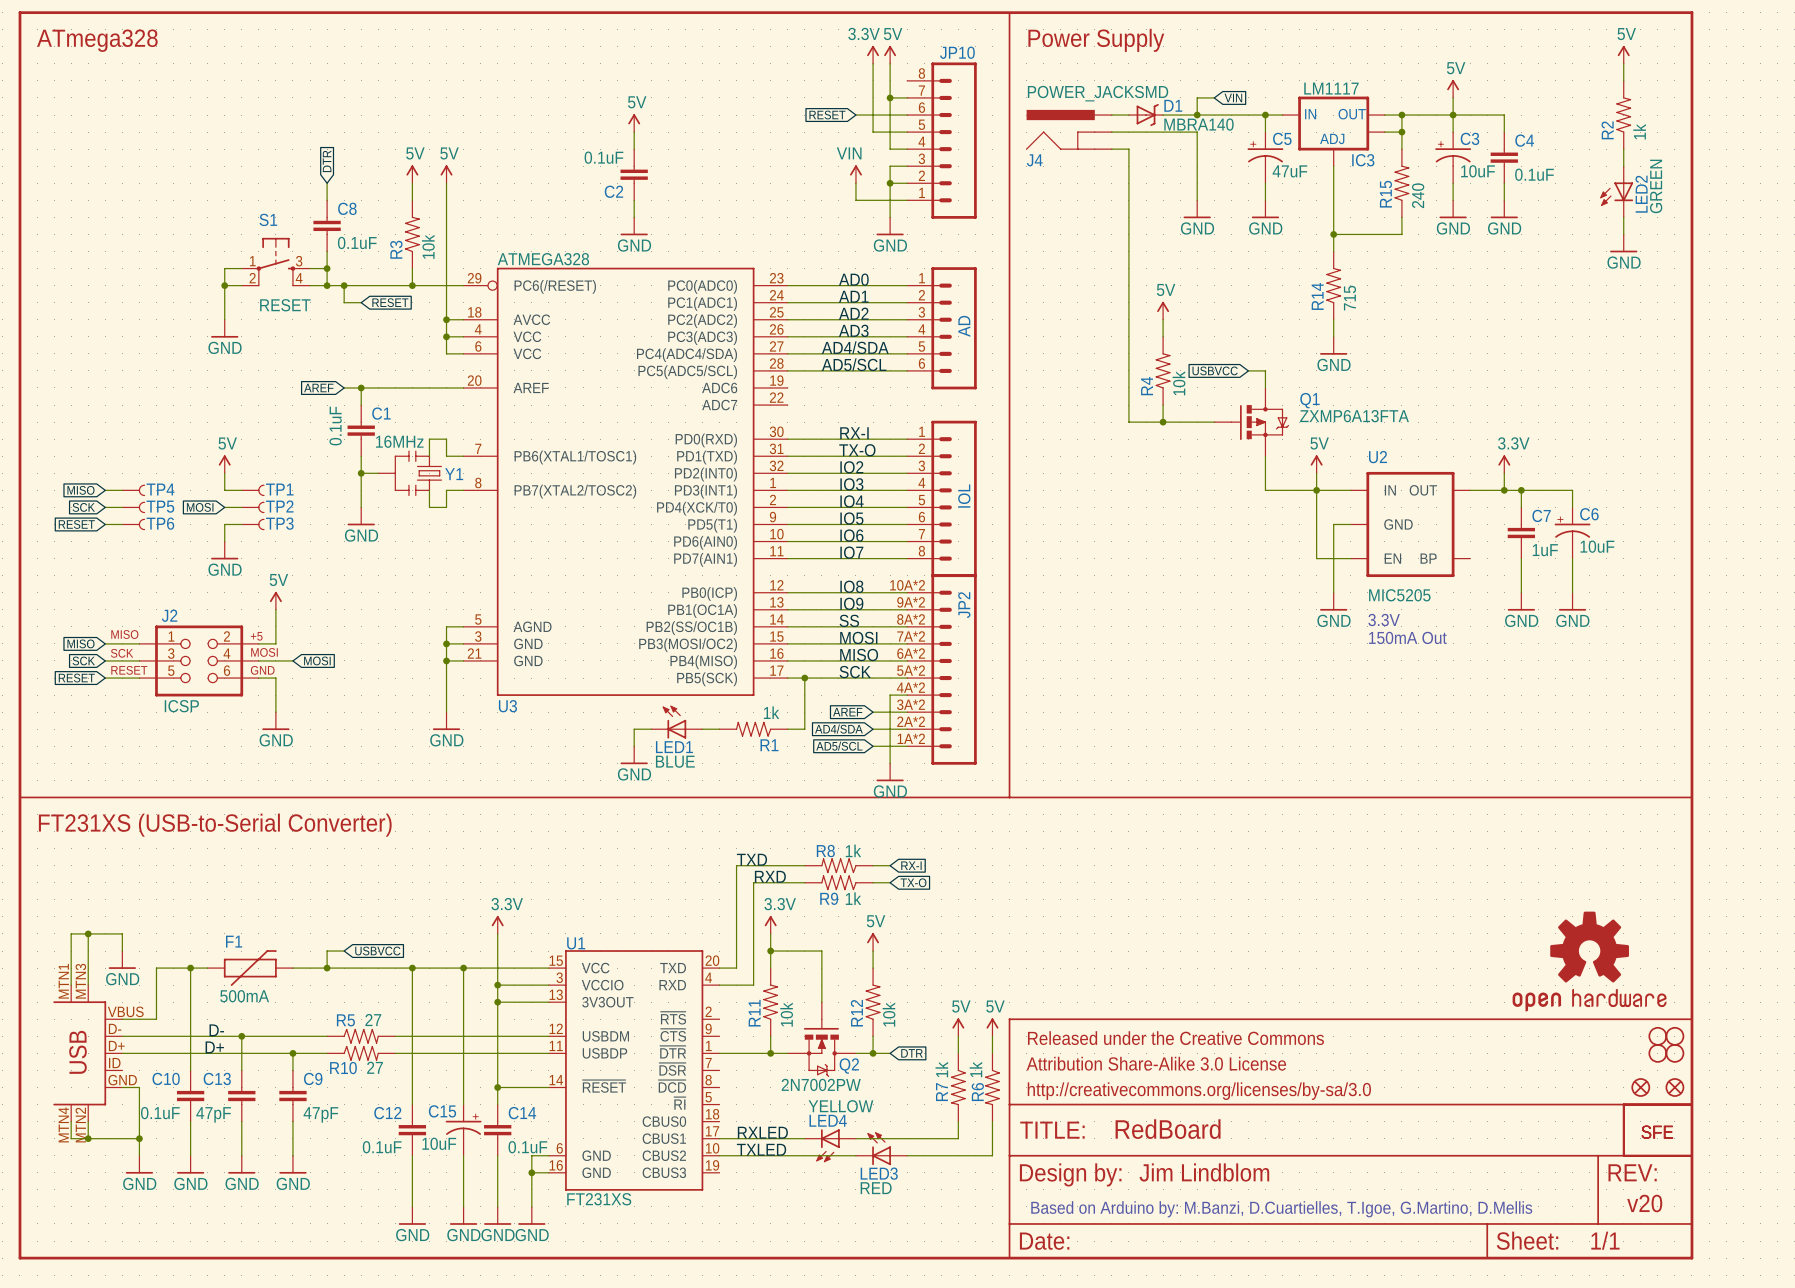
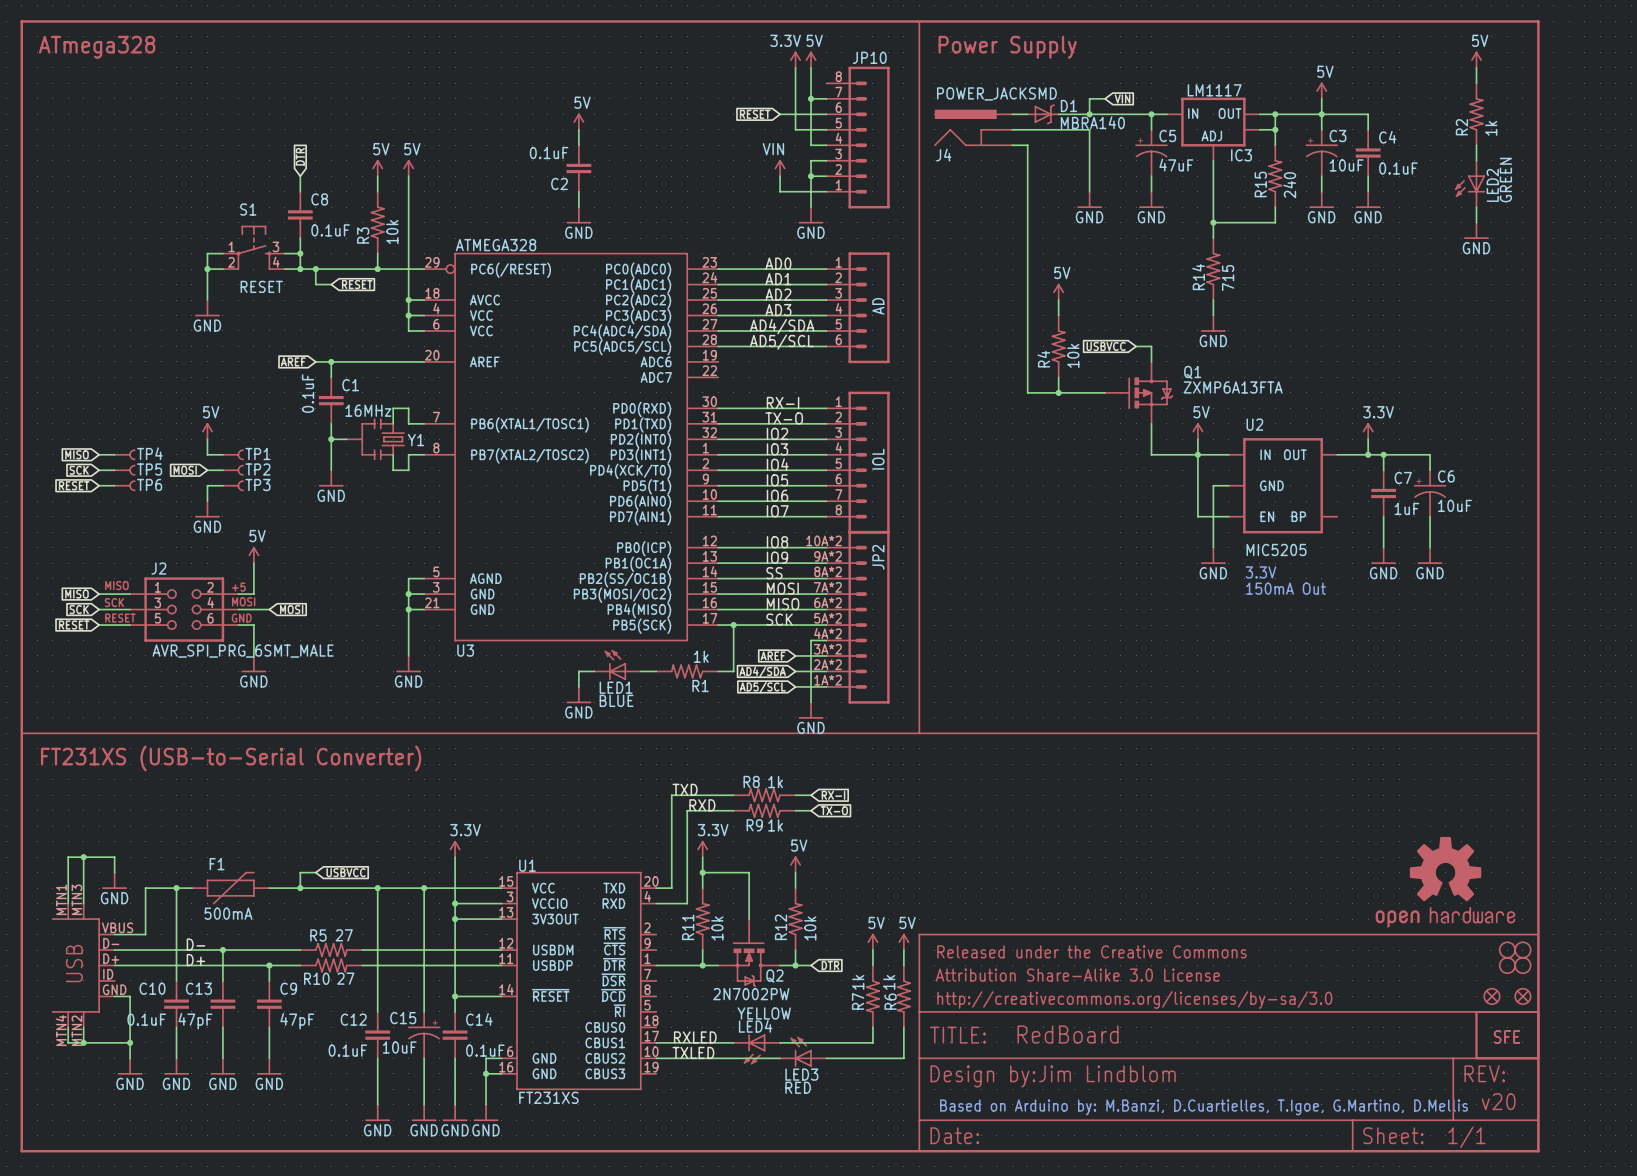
J2 value: ICSP (181, 706) -> AVR_SPI_PRG_6SMT_MALE (243, 651)

